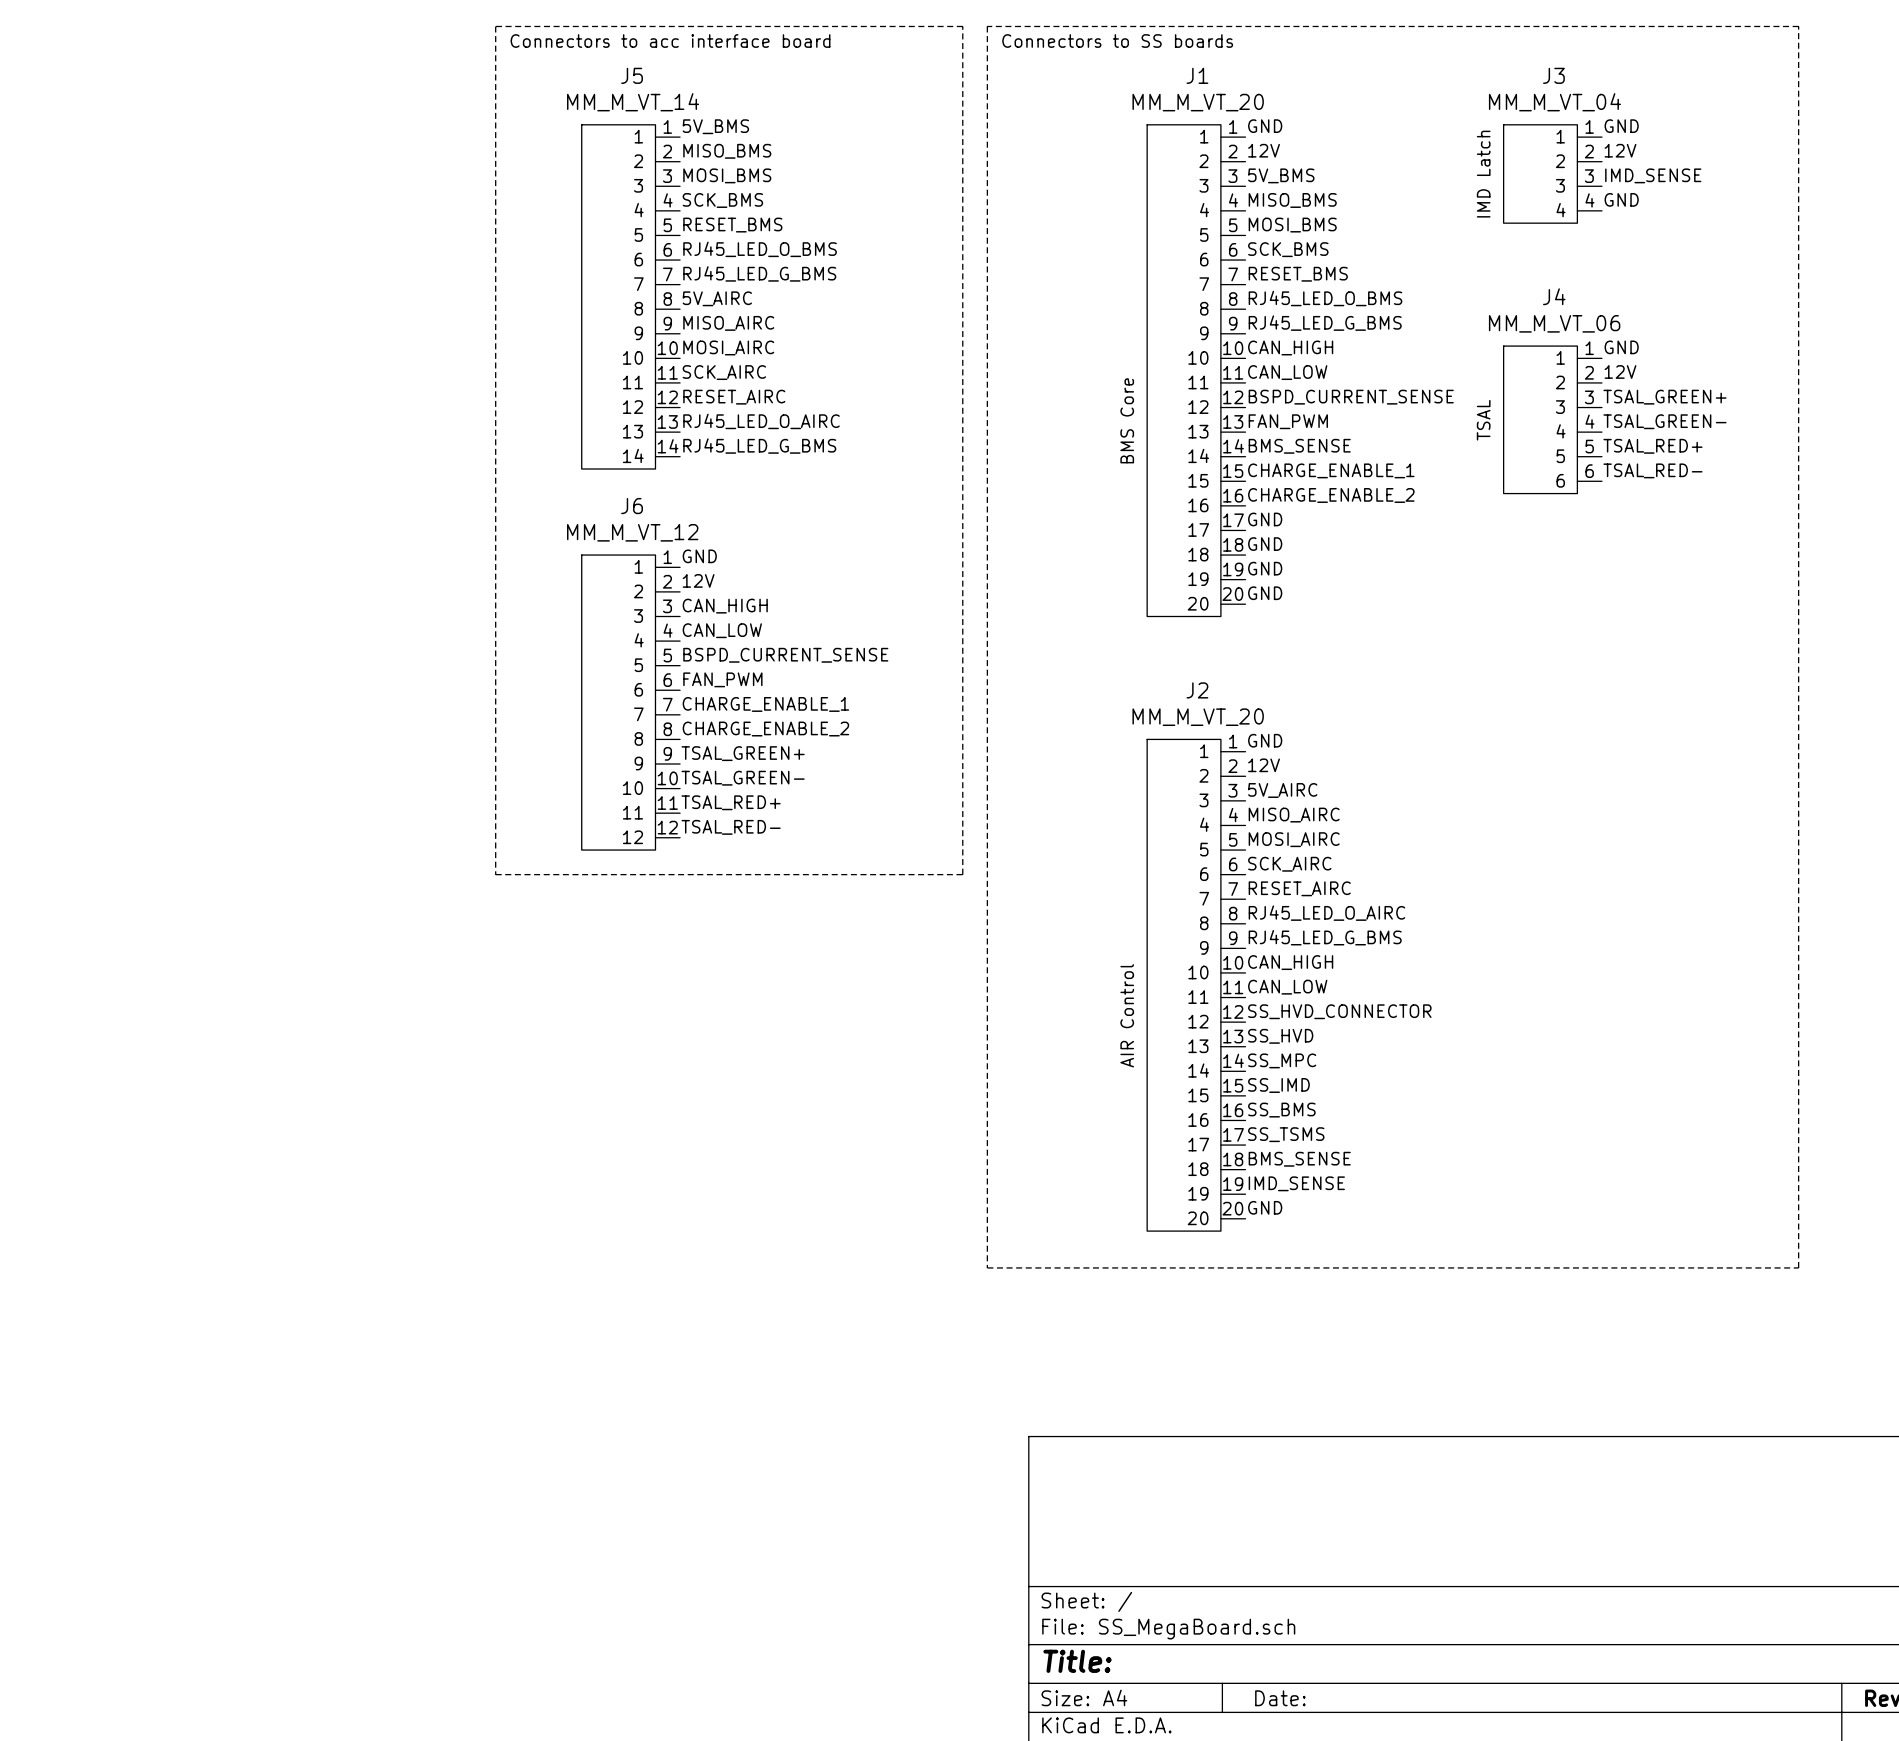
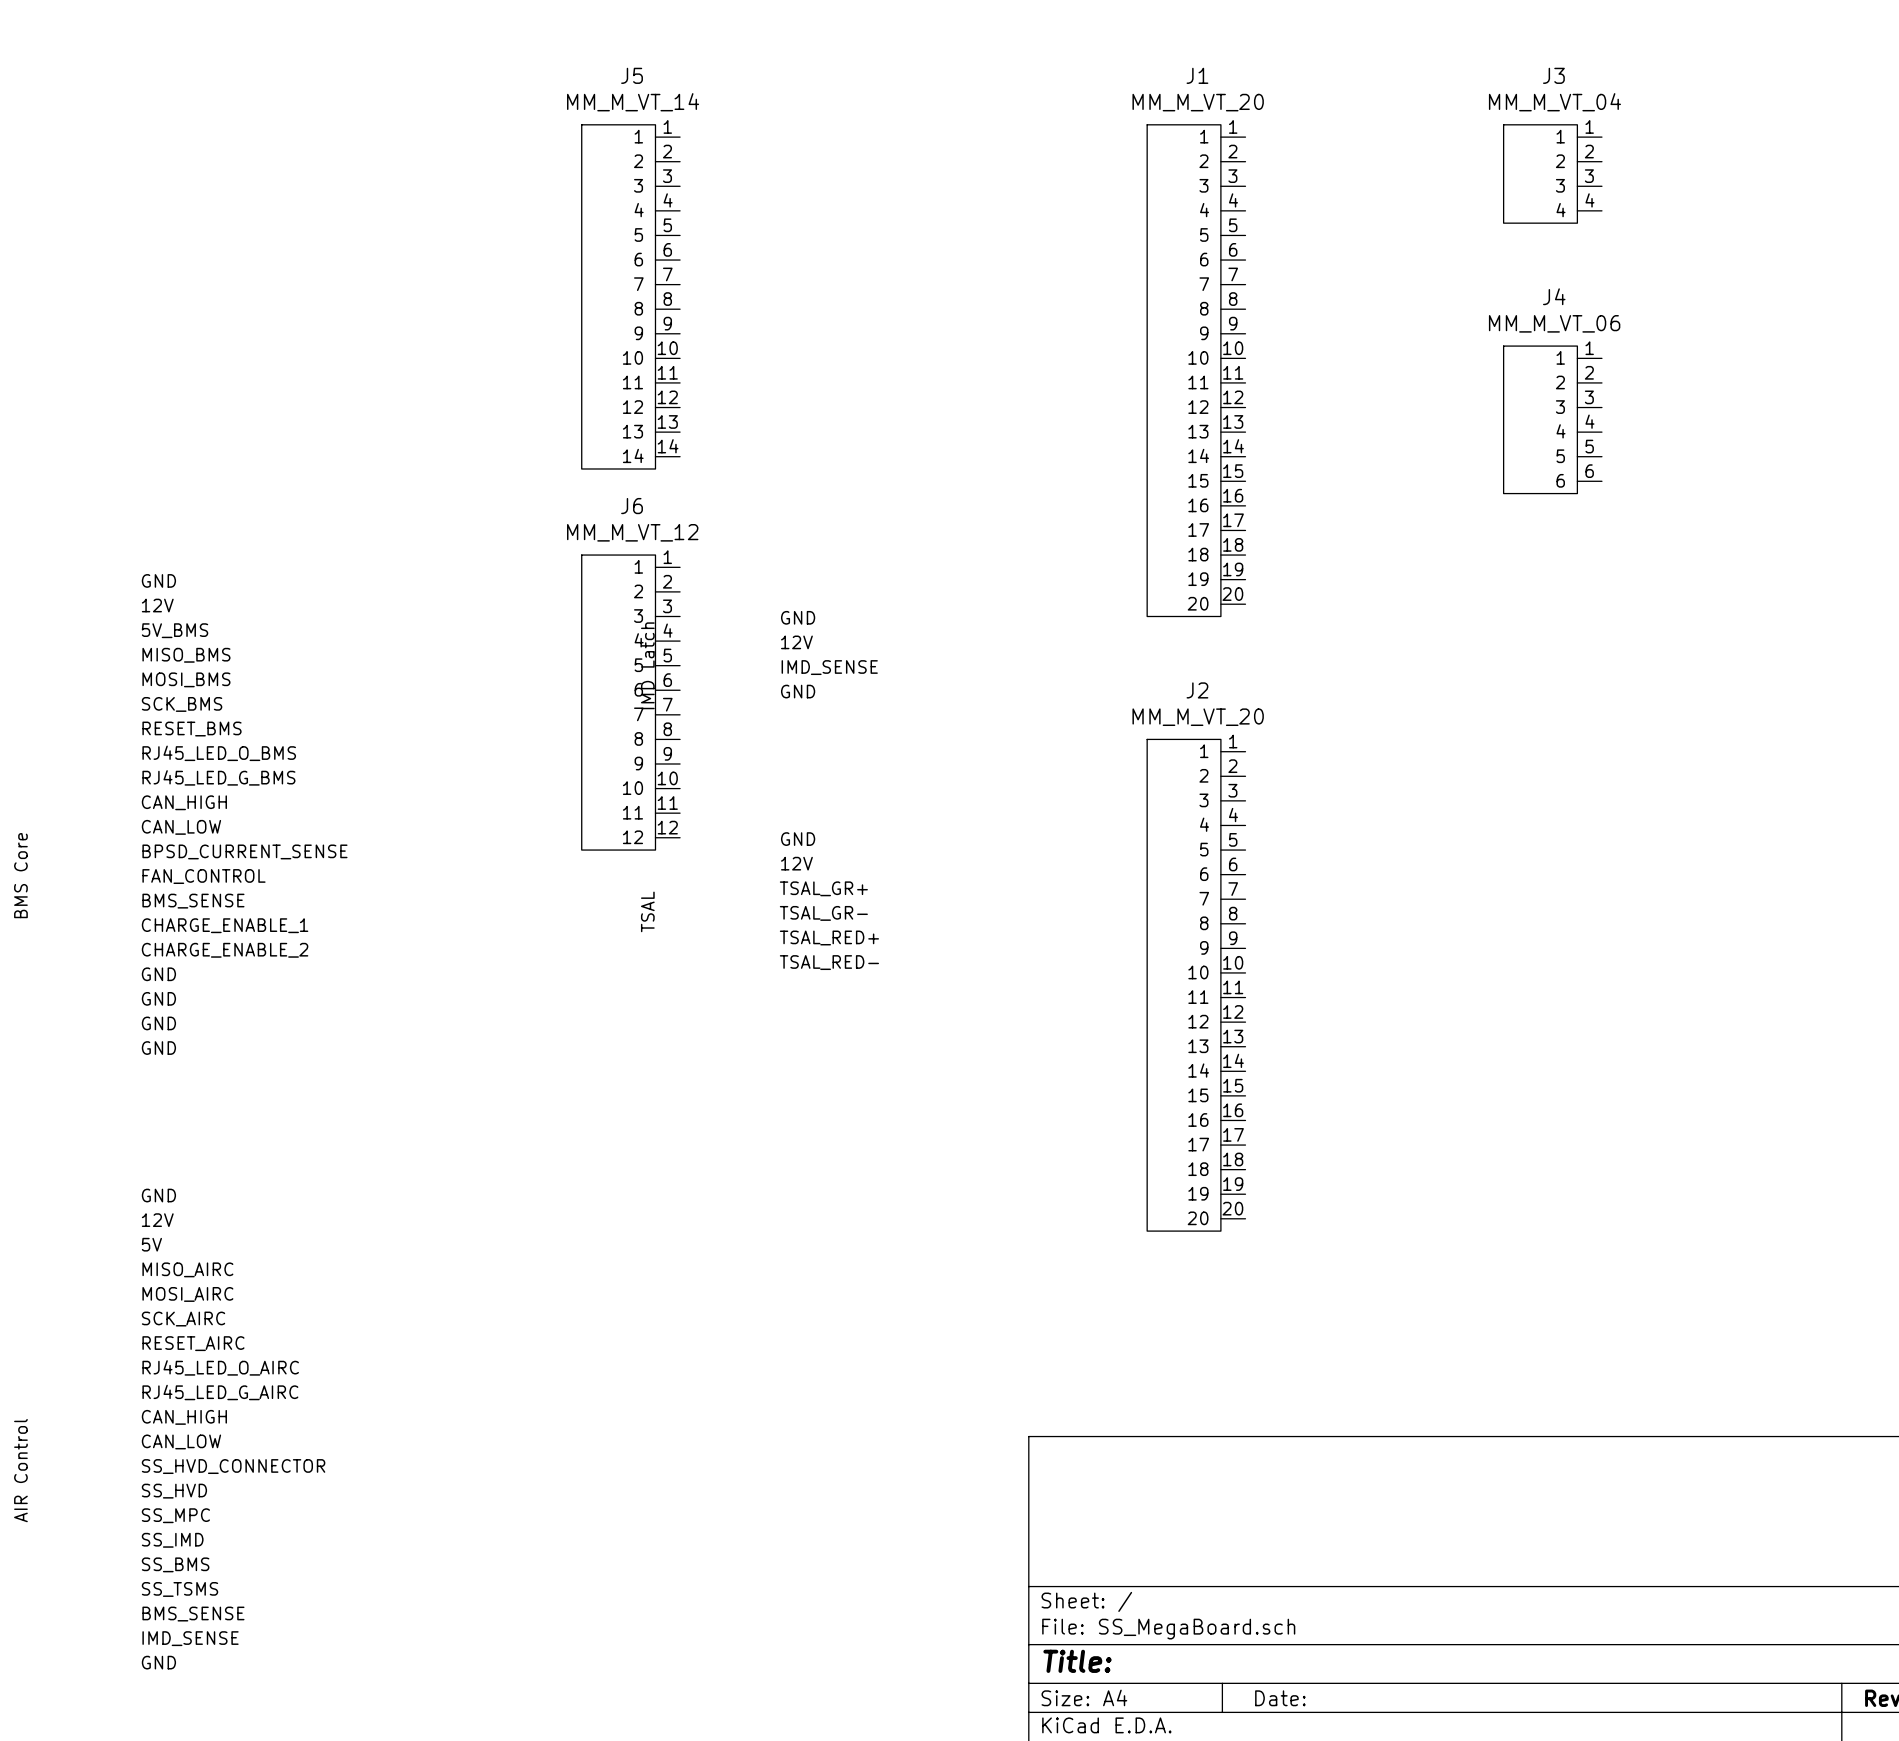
line: (495, 26) (962, 26) (962, 874) (495, 874) (495, 26) -> none
line: (987, 26) (1798, 26) (1798, 1267) (987, 1267) (987, 26) -> none
text: Connectors to acc interface board (670, 40) -> none
text: Connectors to SS boards (1117, 40) -> none
label: 5V_BMS (715, 126) -> none
label: GND (1265, 126) -> none
label: GND (1621, 126) -> none
label: 12V (1264, 150) -> none
label: 12V (1620, 150) -> none
label: MISO_BMS (727, 151) -> none
text: IMD Latch (1483, 174) -> none
label: MOSI_BMS (727, 175) -> none
label: 5V_BMS (1281, 175) -> none
label: IMD_SENSE (1653, 175) -> none
label: GND (1621, 199) -> none
label: SCK_BMS (722, 200) -> none
label: MISO_BMS (1292, 200) -> none
label: RESET_BMS (732, 225) -> none
label: MOSI_BMS (1292, 225) -> none
label: RJ45_LED_O_BMS (760, 249) -> none
label: SCK_BMS (1288, 249) -> none
label: RJ45_LED_G_BMS (759, 273) -> none
label: RESET_BMS (1298, 274) -> none
label: 5V_AIRC (717, 298) -> none
label: RJ45_LED_O_BMS (1325, 298) -> none
label: MISO_AIRC (728, 323) -> none
label: RJ45_LED_G_BMS (1325, 323) -> none
label: MOSI_AIRC (728, 347) -> none
label: CAN_HIGH (1290, 347) -> none
label: GND (1621, 347) -> none
label: 12V (1620, 371) -> none
label: SCK_AIRC (724, 372) -> none
label: CAN_LOW (1287, 372) -> none
label: RESET_AIRC (734, 397) -> none
label: BSPD_CURRENT_SENSE (1351, 397) -> none
label: TSAL_GREEN+ (1664, 397) -> none
text: BMS Core (1127, 420) -> none
text: TSAL (1483, 420) -> none
label: RJ45_LED_O_AIRC (761, 421) -> none
label: FAN_PWM (1288, 421) -> none
label: TSAL_GREEN- (1664, 421) -> none
label: RJ45_LED_G_BMS (759, 446) -> none
label: BMS_SENSE (1299, 446) -> none
label: TSAL_RED+ (1652, 446) -> none
label: CHARGE_ENABLE_1 (1331, 470) -> none
label: TSAL_RED- (1652, 470) -> none
label: CHARGE_ENABLE_2 (1331, 495) -> none
label: GND (1265, 519) -> none
label: GND (1265, 544) -> none
label: GND (699, 556) -> none
label: GND (1265, 568) -> none
label: none -> GND (158, 580)
label position: 12V (698, 580) -> 12V (796, 642)
label: GND (1265, 593) -> none
label: none -> 12V (157, 605)
label: CAN_HIGH (725, 606) -> none
label: none -> GND (798, 617)
label: none -> 5V_BMS (175, 630)
label: CAN_LOW (722, 630) -> none
label: none -> MISO_BMS (186, 655)
label: BSPD_CURRENT_SENSE (785, 655) -> none
text: none -> IMD Latch (647, 665)
label: none -> IMD_SENSE (829, 667)
label: none -> MOSI_BMS (186, 679)
label: FAN_PWM (722, 679) -> none
label: none -> GND (798, 691)
label: none -> SCK_BMS (182, 704)
label: CHARGE_ENABLE_1 (765, 704) -> none
label: none -> RESET_BMS (191, 729)
label: CHARGE_ENABLE_2 (765, 729) -> none
label: GND (1265, 740) -> none
label: none -> RJ45_LED_O_BMS (219, 753)
label: TSAL_GREEN+ (743, 753) -> none
label: 12V (1264, 765) -> none
label: none -> RJ45_LED_G_BMS (218, 777)
label: TSAL_GREEN- (743, 778) -> none
label: 5V_AIRC (1282, 790) -> none
label: none -> CAN_HIGH (184, 802)
label position: TSAL_RED+ (731, 802) -> TSAL_RED+ (829, 937)
label: MISO_AIRC (1294, 815) -> none
label: none -> CAN_LOW (181, 827)
label position: TSAL_RED- (731, 827) -> TSAL_RED- (829, 962)
label: none -> GND (798, 839)
label: MOSI_AIRC (1294, 839) -> none
label: none -> BPSD_CURRENT_SENSE (244, 851)
label: none -> 12V (796, 863)
label: SCK_AIRC (1289, 864) -> none
text: none -> BMS Core (20, 875)
label: none -> FAN_CONTROL (203, 876)
label: none -> TSAL_GR+ (823, 888)
label: RESET_AIRC (1299, 888) -> none
label: none -> BMS_SENSE (193, 901)
text: none -> TSAL (647, 911)
label: none -> TSAL_GR- (823, 913)
label: RJ45_LED_O_AIRC (1326, 913) -> none
label: none -> CHARGE_ENABLE_1 (225, 925)
label: RJ45_LED_G_BMS (1325, 937) -> none
label: none -> CHARGE_ENABLE_2 (225, 950)
label: CAN_HIGH (1290, 962) -> none
label: none -> GND (158, 974)
label: CAN_LOW (1287, 987) -> none
label: none -> GND (158, 998)
label: SS_HVD_CONNECTOR (1339, 1011) -> none
text: AIR Control (1127, 1015) -> none
label: none -> GND (158, 1023)
label: SS_HVD (1280, 1036) -> none
label: none -> GND (158, 1048)
label: SS_MPC (1282, 1060) -> none
label: SS_IMD (1278, 1085) -> none
label: SS_BMS (1281, 1110) -> none
label: SS_TSMS (1286, 1134) -> none
label: BMS_SENSE (1299, 1159) -> none
label: IMD_SENSE (1296, 1183) -> none
label: none -> GND (158, 1195)
label: GND (1265, 1207) -> none
label: none -> 12V (157, 1220)
label: none -> 5V (151, 1244)
label: none -> MISO_AIRC (187, 1269)
label: none -> MOSI_AIRC (187, 1294)
label: none -> SCK_AIRC (183, 1319)
label: none -> RESET_AIRC (193, 1343)
label: none -> RJ45_LED_O_AIRC (220, 1367)
label: none -> RJ45_LED_G_AIRC (220, 1392)
label: none -> CAN_HIGH (184, 1417)
label: none -> CAN_LOW (181, 1441)
label: none -> SS_HVD_CONNECTOR (233, 1466)
text: none -> AIR Control (20, 1470)
label: none -> SS_HVD (174, 1491)
label: none -> SS_MPC (175, 1515)
label: none -> SS_IMD (172, 1540)
label: none -> SS_BMS (175, 1564)
label: none -> SS_TSMS (179, 1589)
label: none -> BMS_SENSE (193, 1614)
label: none -> IMD_SENSE (190, 1638)
label: none -> GND (158, 1662)

